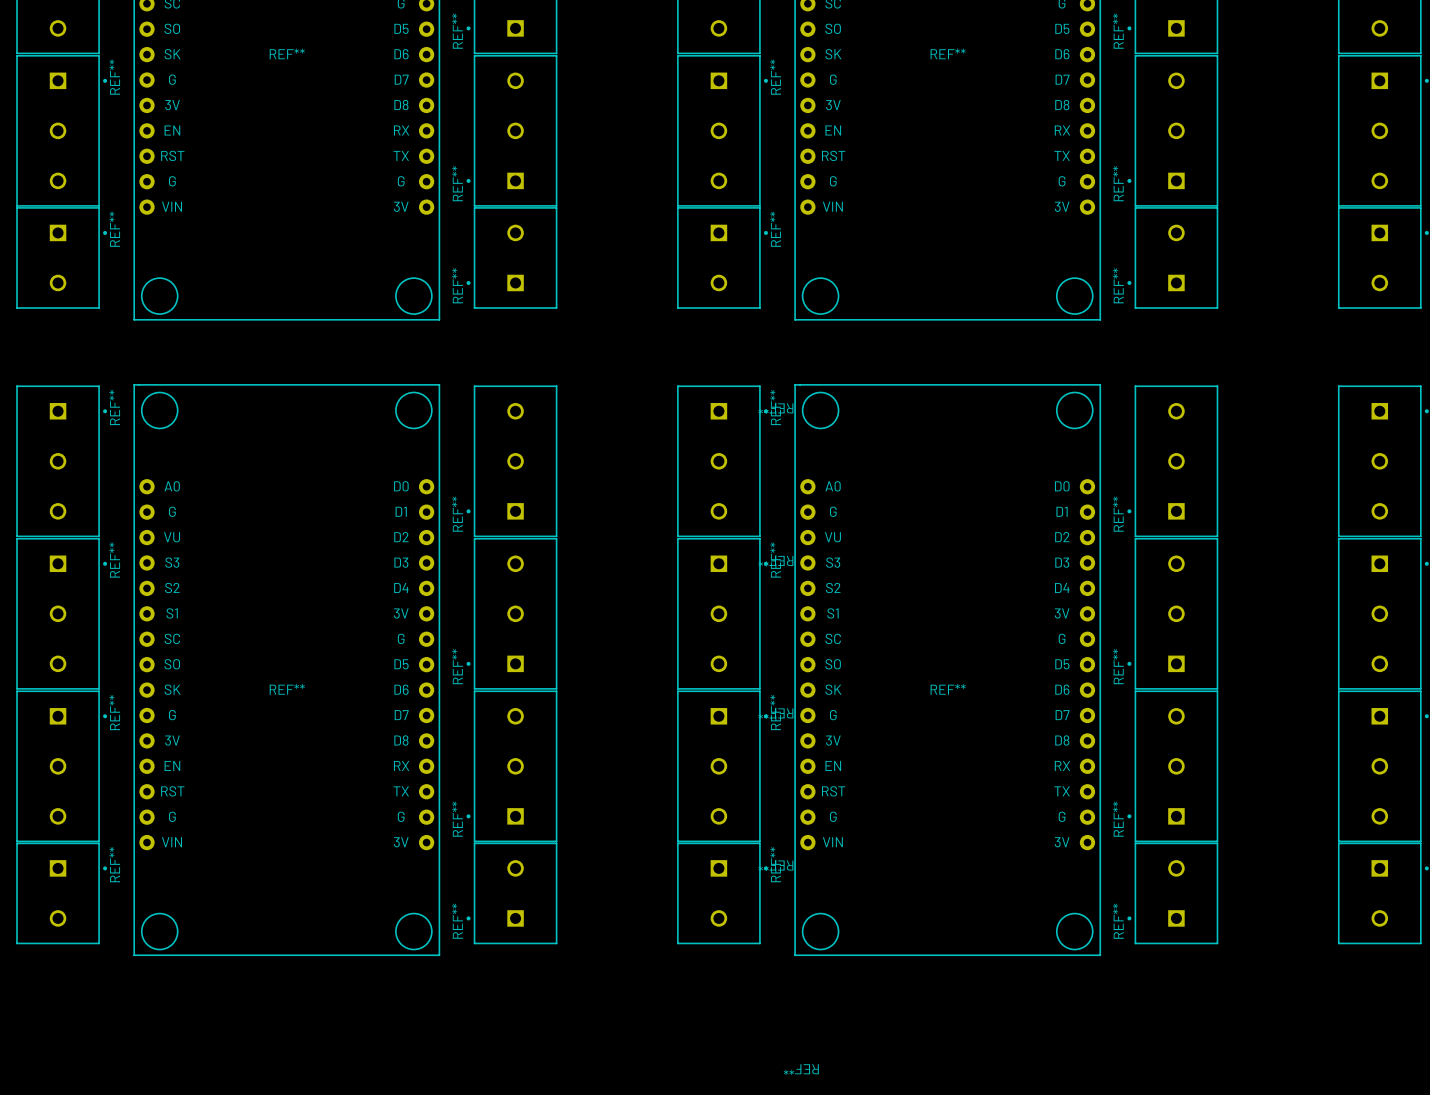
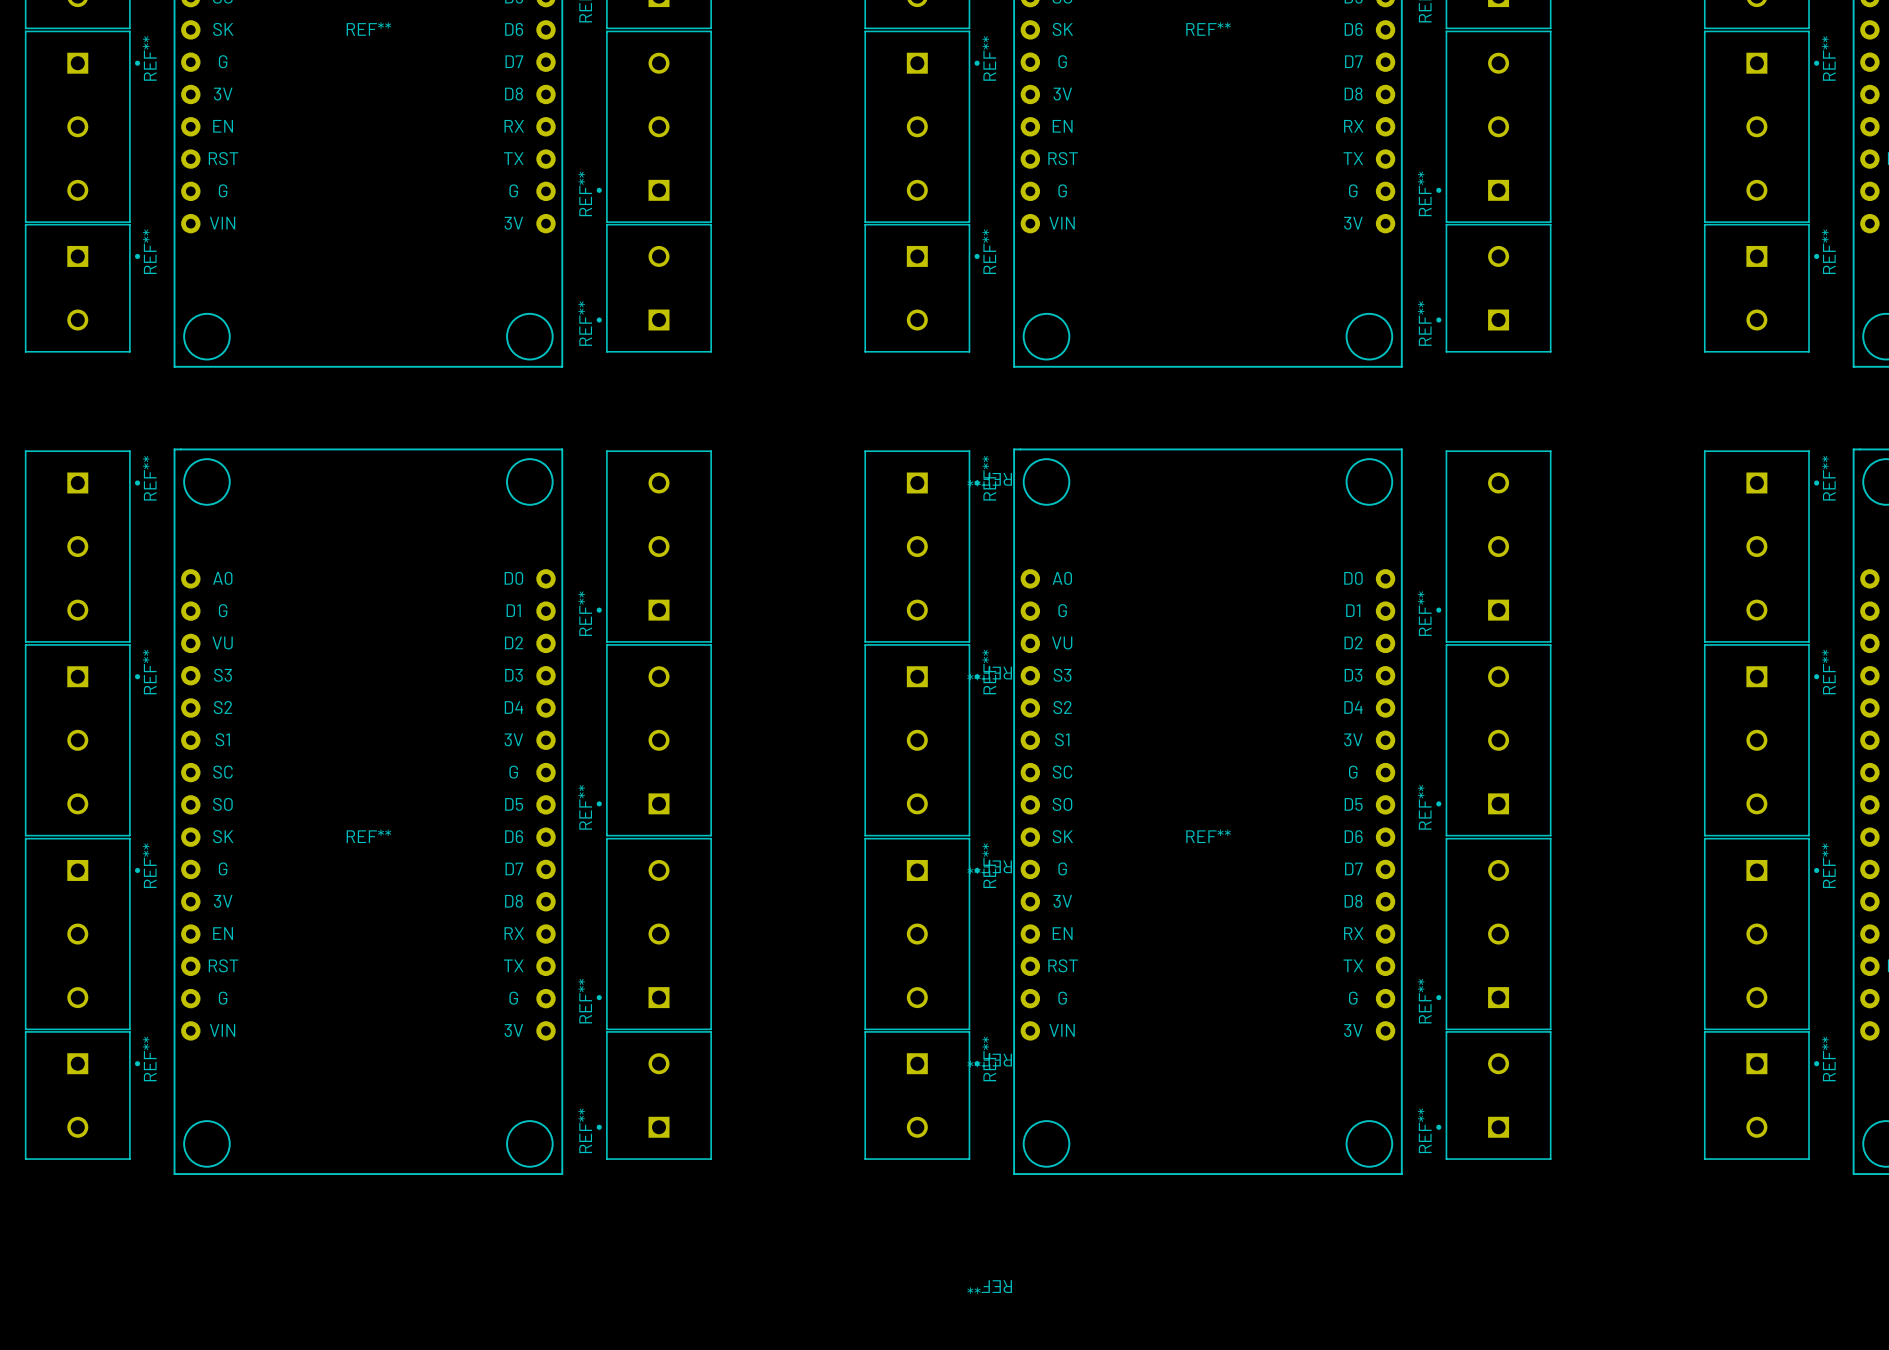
text position: REF** (801, 1069) -> REF** (989, 1287)

